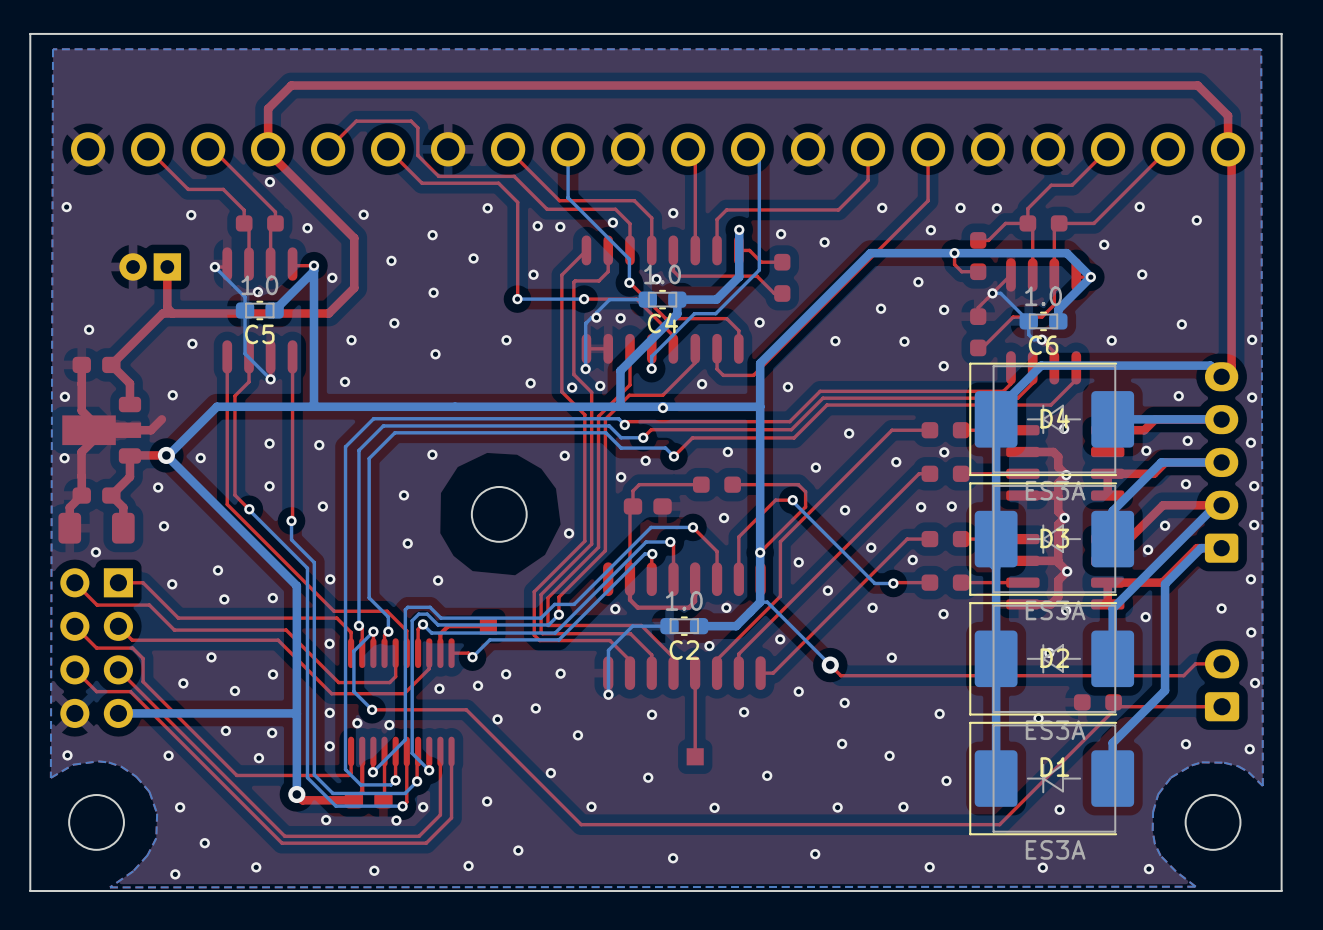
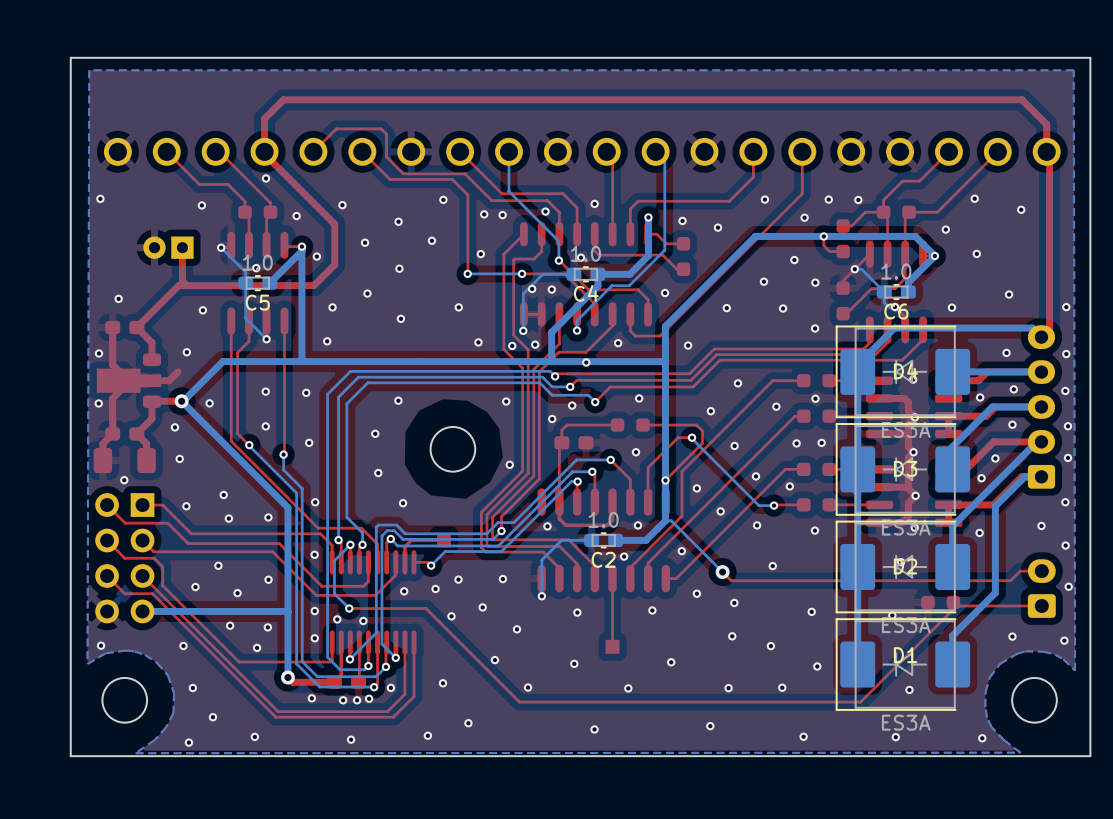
via: none -> (343, 700)
via: none -> (357, 700)

